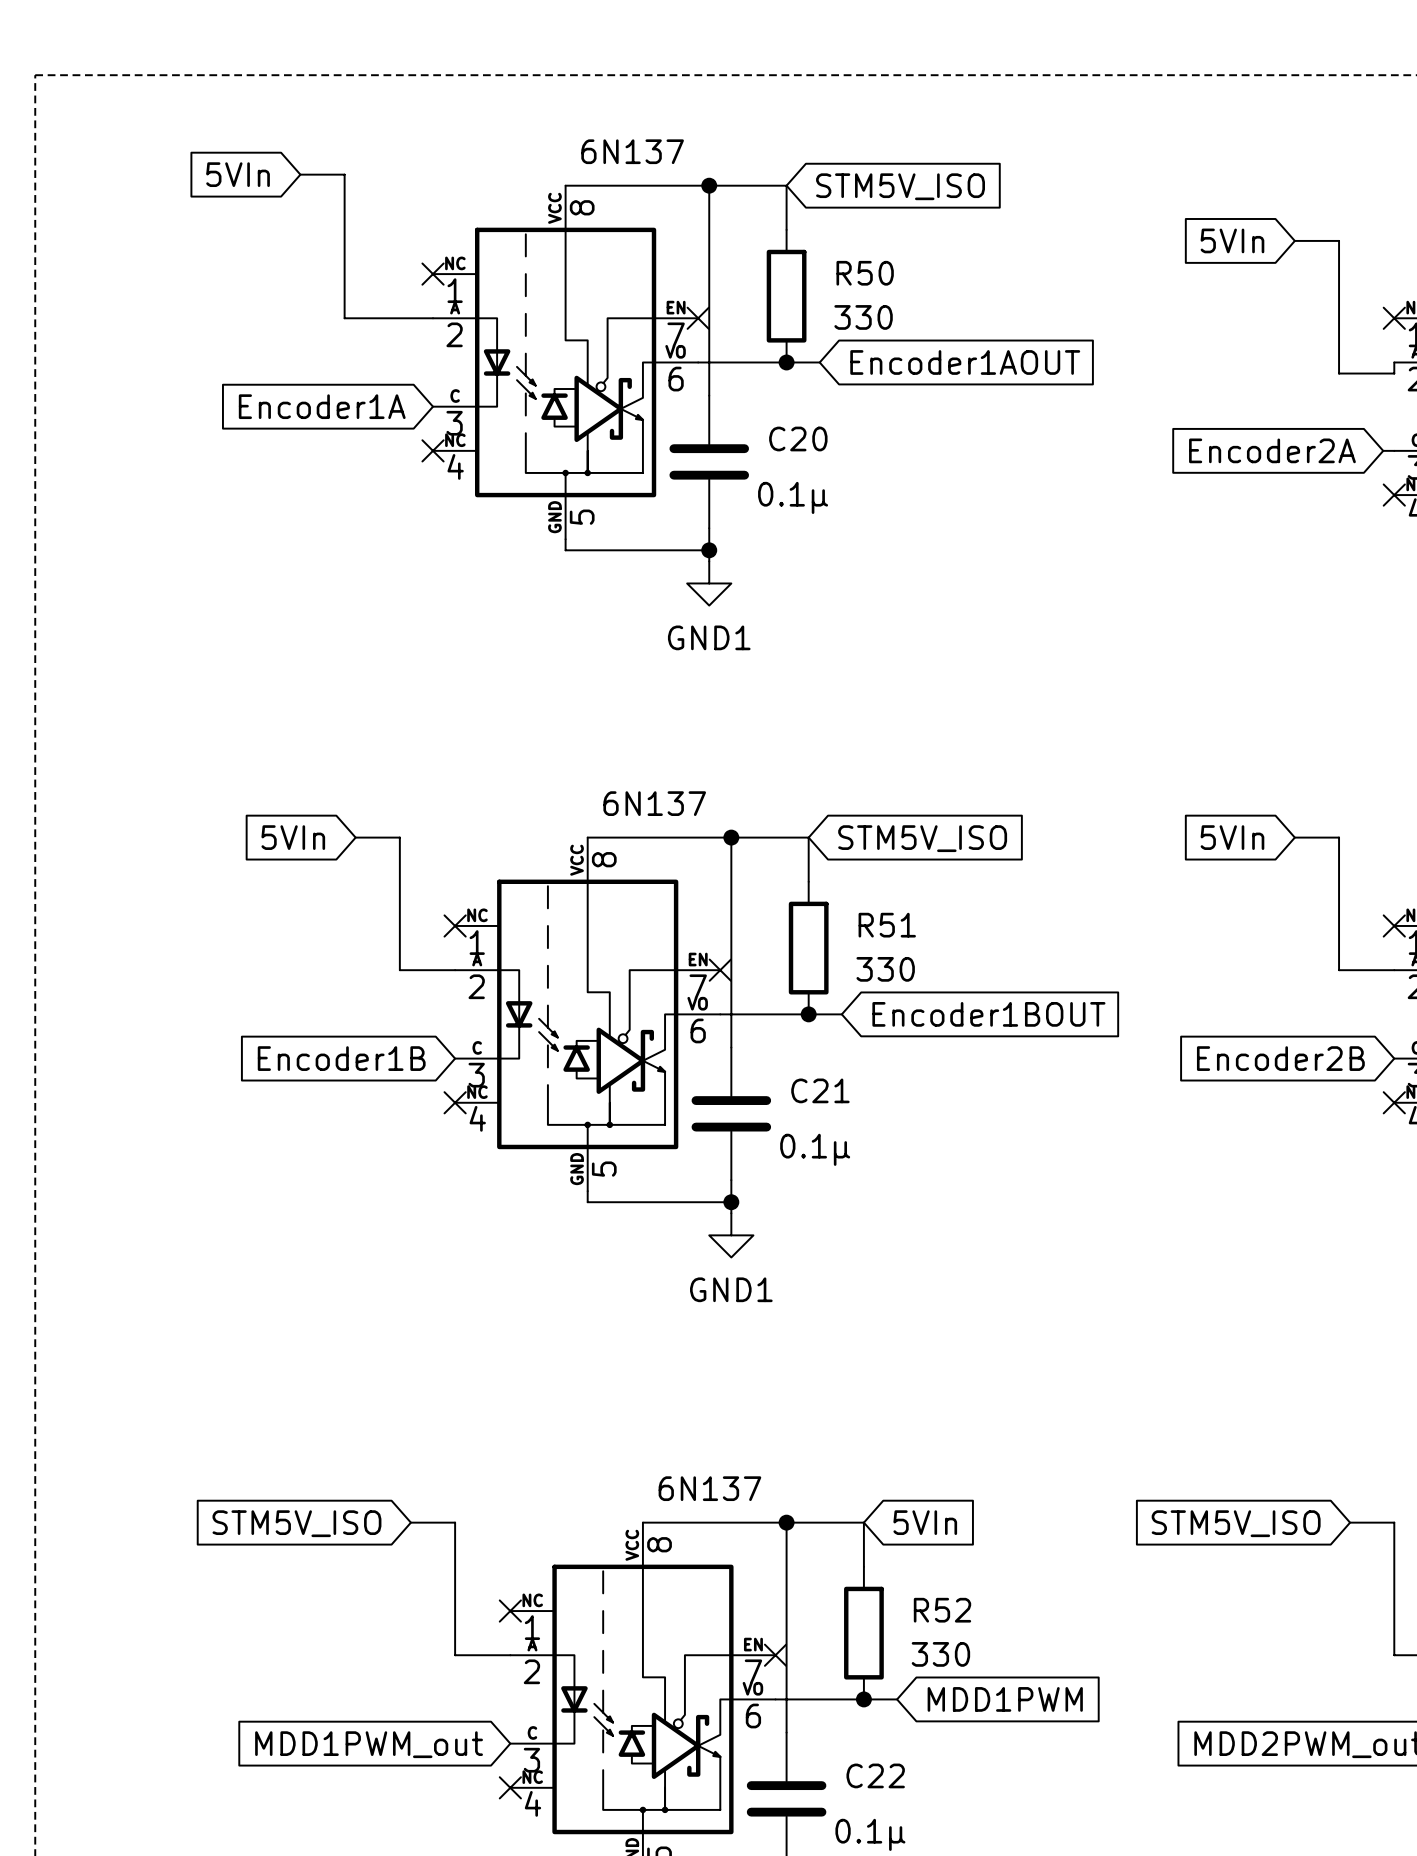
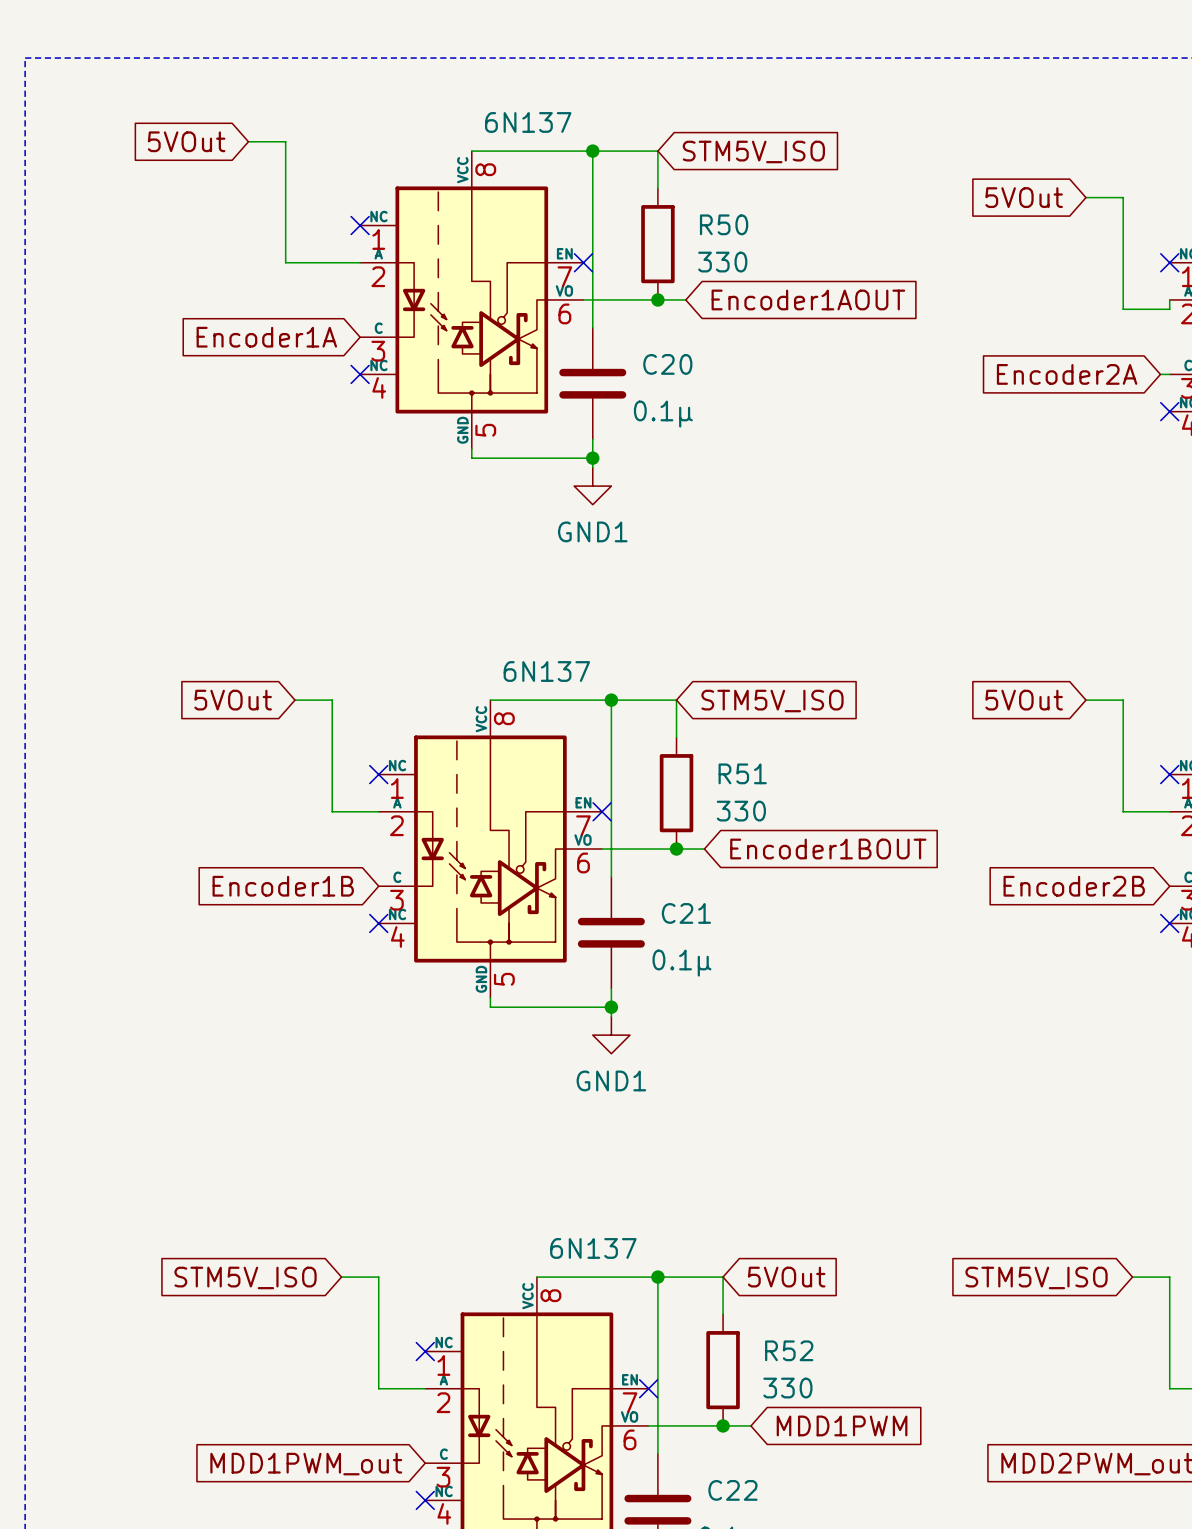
global label: 5VIn (238, 174) -> 5VOut (186, 141)
global label: 5VIn (1232, 240) -> 5VOut (1024, 197)
global label: 5VIn (293, 837) -> 5VOut (233, 700)
global label: 5VIn (1232, 837) -> 5VOut (1024, 700)
global label: 5VIn (925, 1522) -> 5VOut (786, 1277)

